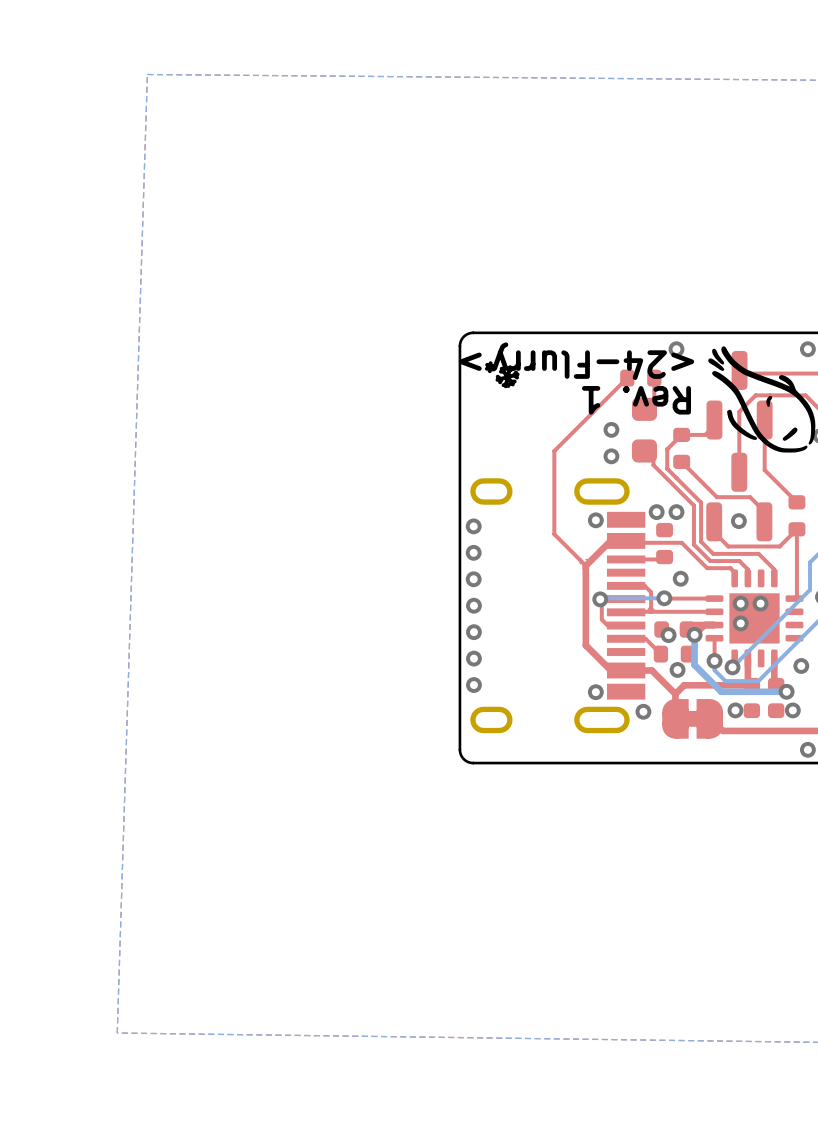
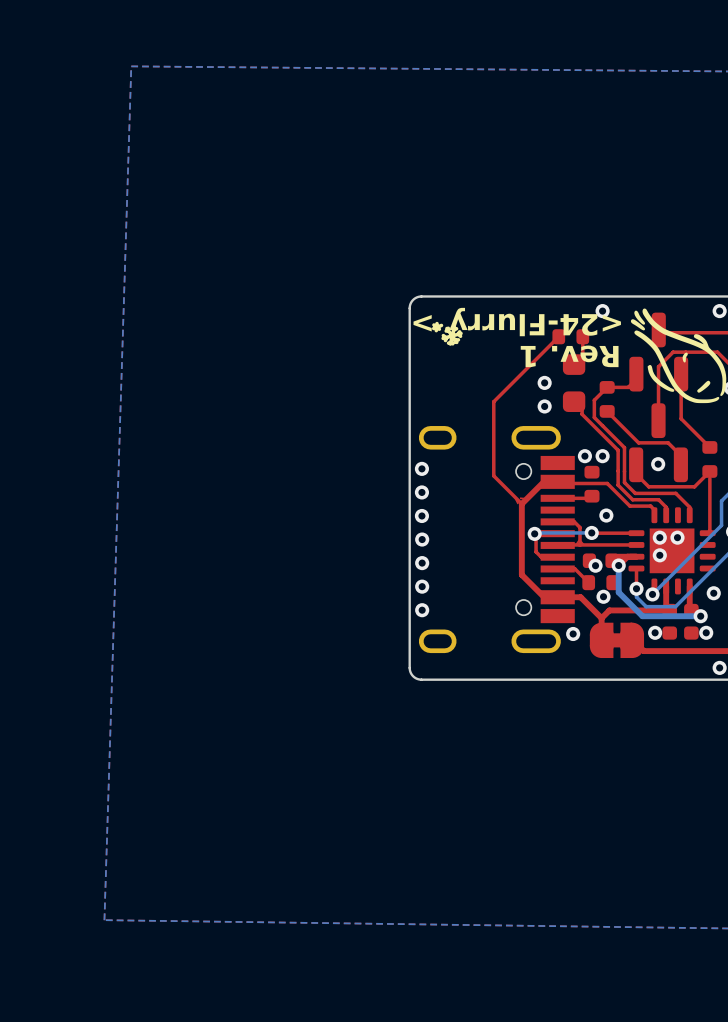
part footprint: [470, 478, 646, 734] -> [418, 426, 575, 654]
via: (595, 520) -> none
via: (595, 692) -> none

